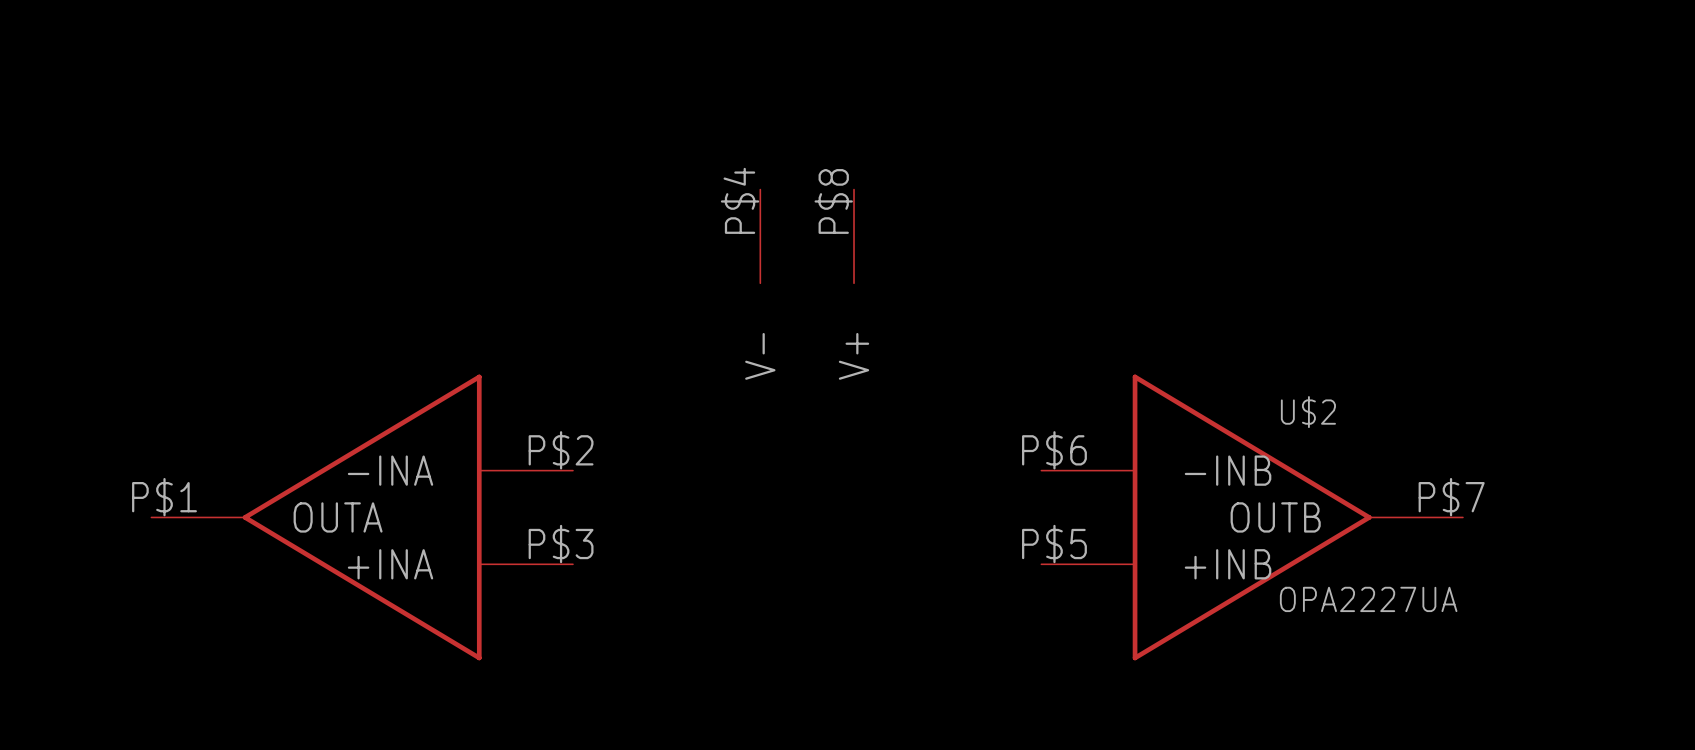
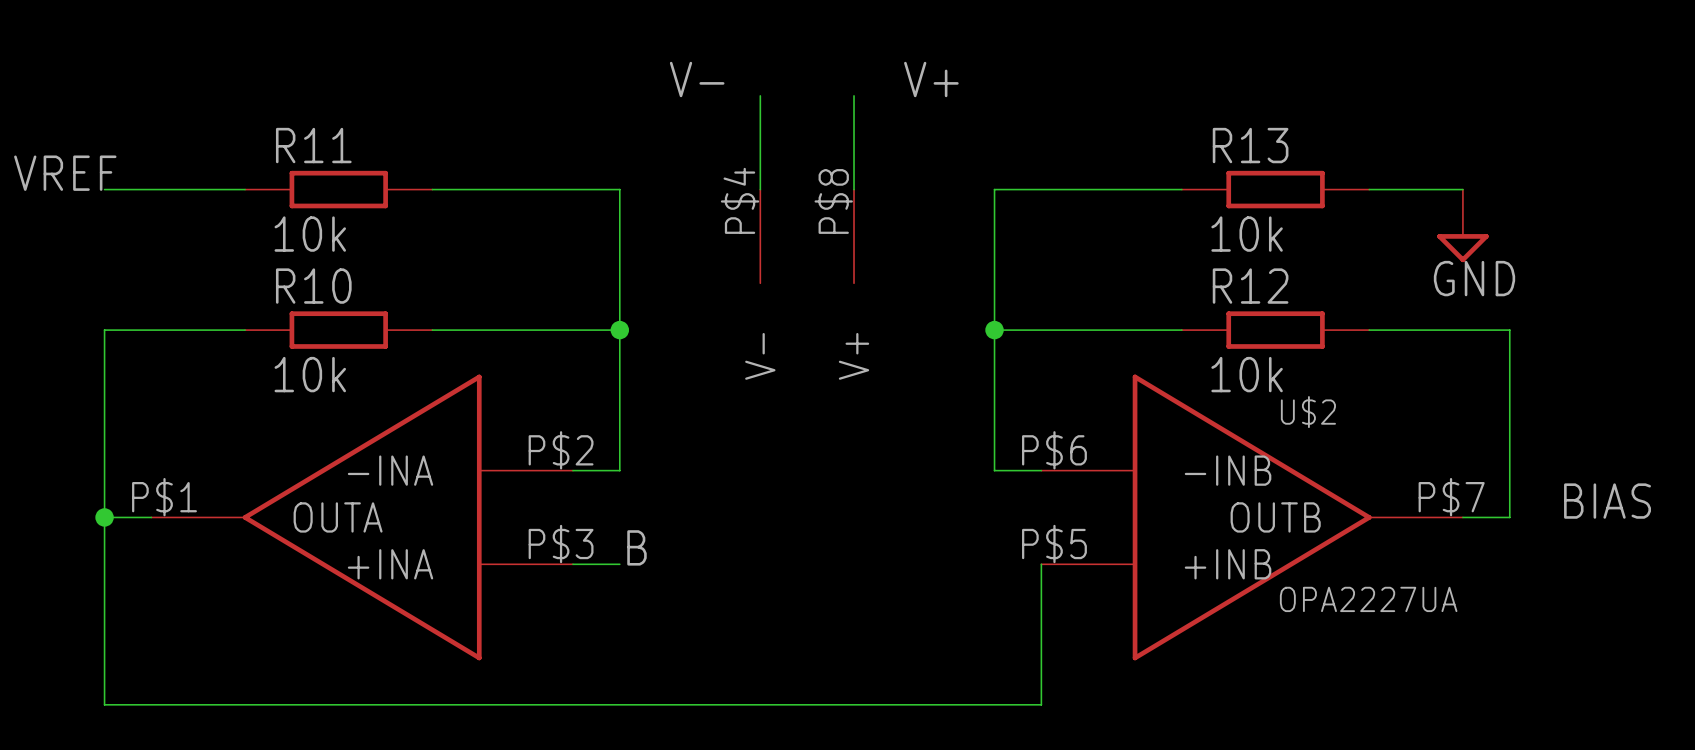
label: none -> V- (697, 79)
label: none -> V+ (931, 79)
wire: none -> (760, 95) (760, 189)
wire: none -> (854, 95) (854, 189)
label: none -> VREF (65, 173)
wire: none -> (104, 189) (245, 189)
R11: none -> 10k (338, 189)
wire: none -> (432, 189) (619, 189) (619, 470) (572, 470)
wire: none -> (1181, 189) (994, 189) (994, 470) (1041, 470)
R13: none -> 10k (1275, 189)
wire: none -> (1369, 189) (1462, 189)
power symbol: none -> GND (1462, 225)
wire: none -> (245, 330) (104, 330) (104, 704) (1041, 704) (1041, 564)
R10: none -> 10k (338, 330)
wire: none -> (432, 330) (619, 330)
junction: none -> (619, 330)
wire: none -> (994, 330) (1181, 330)
junction: none -> (994, 330)
R12: none -> 10k (1275, 330)
wire: none -> (1369, 330) (1509, 330) (1509, 517) (1462, 517)
label: none -> BIAS (1607, 501)
wire: none -> (104, 517) (151, 517)
junction: none -> (104, 517)
label: none -> B (636, 547)
wire: none -> (572, 564) (619, 564)

